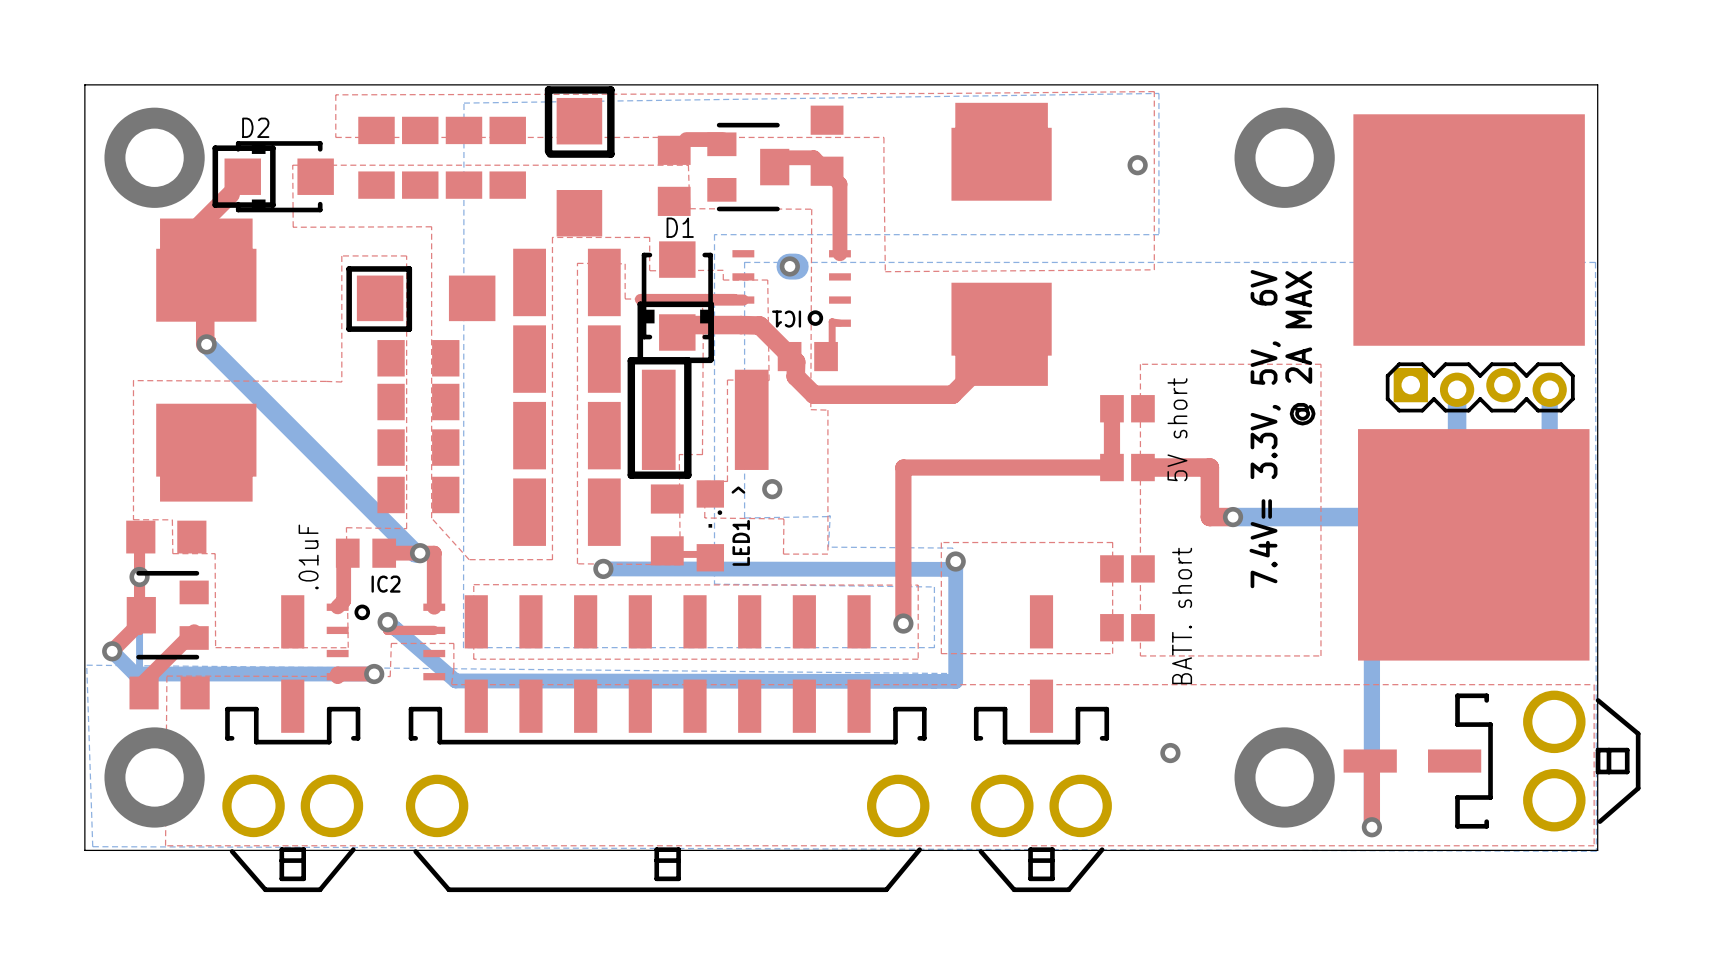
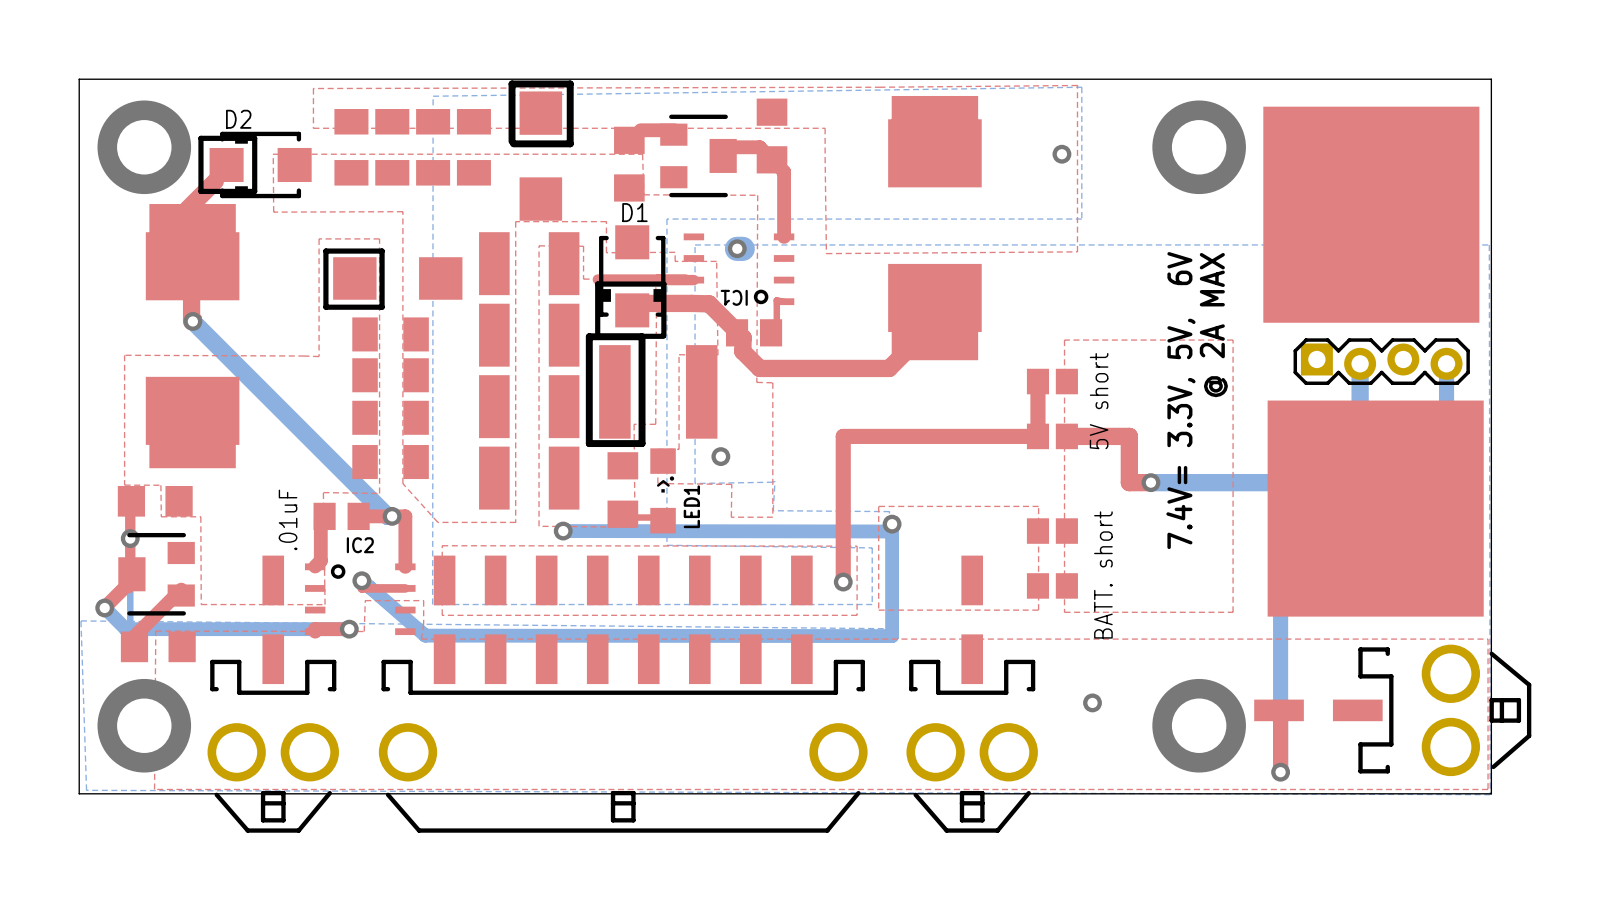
text position: ^ (738, 490) -> ^ (663, 483)

